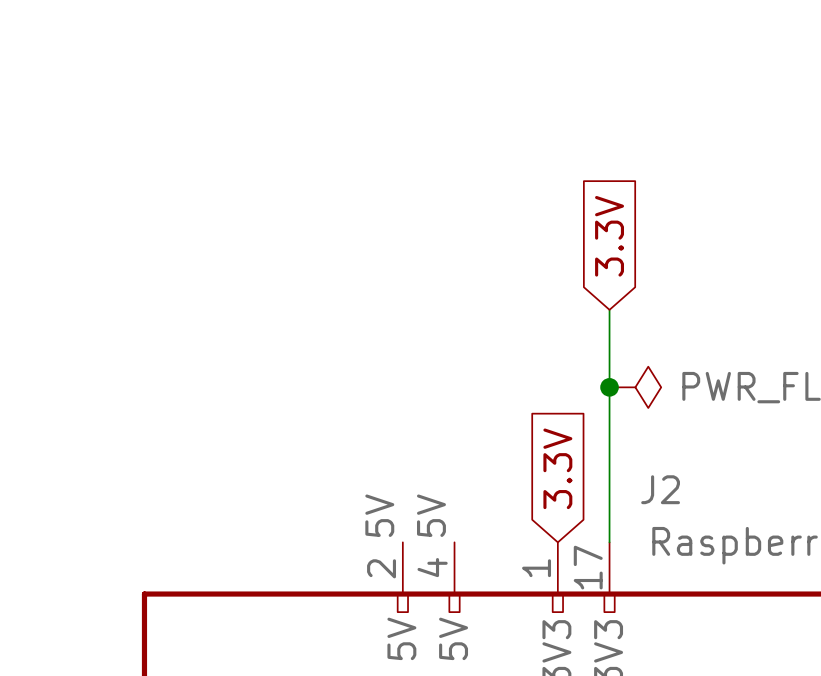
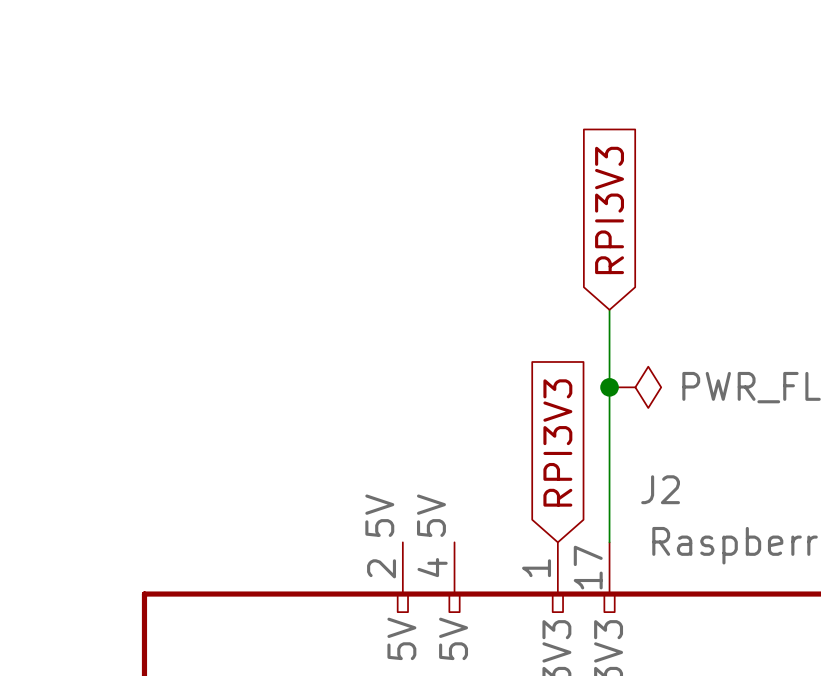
global label: 3.3V (609, 236) -> RPI3V3 (609, 210)
global label: 3.3V (557, 468) -> RPI3V3 (557, 442)

